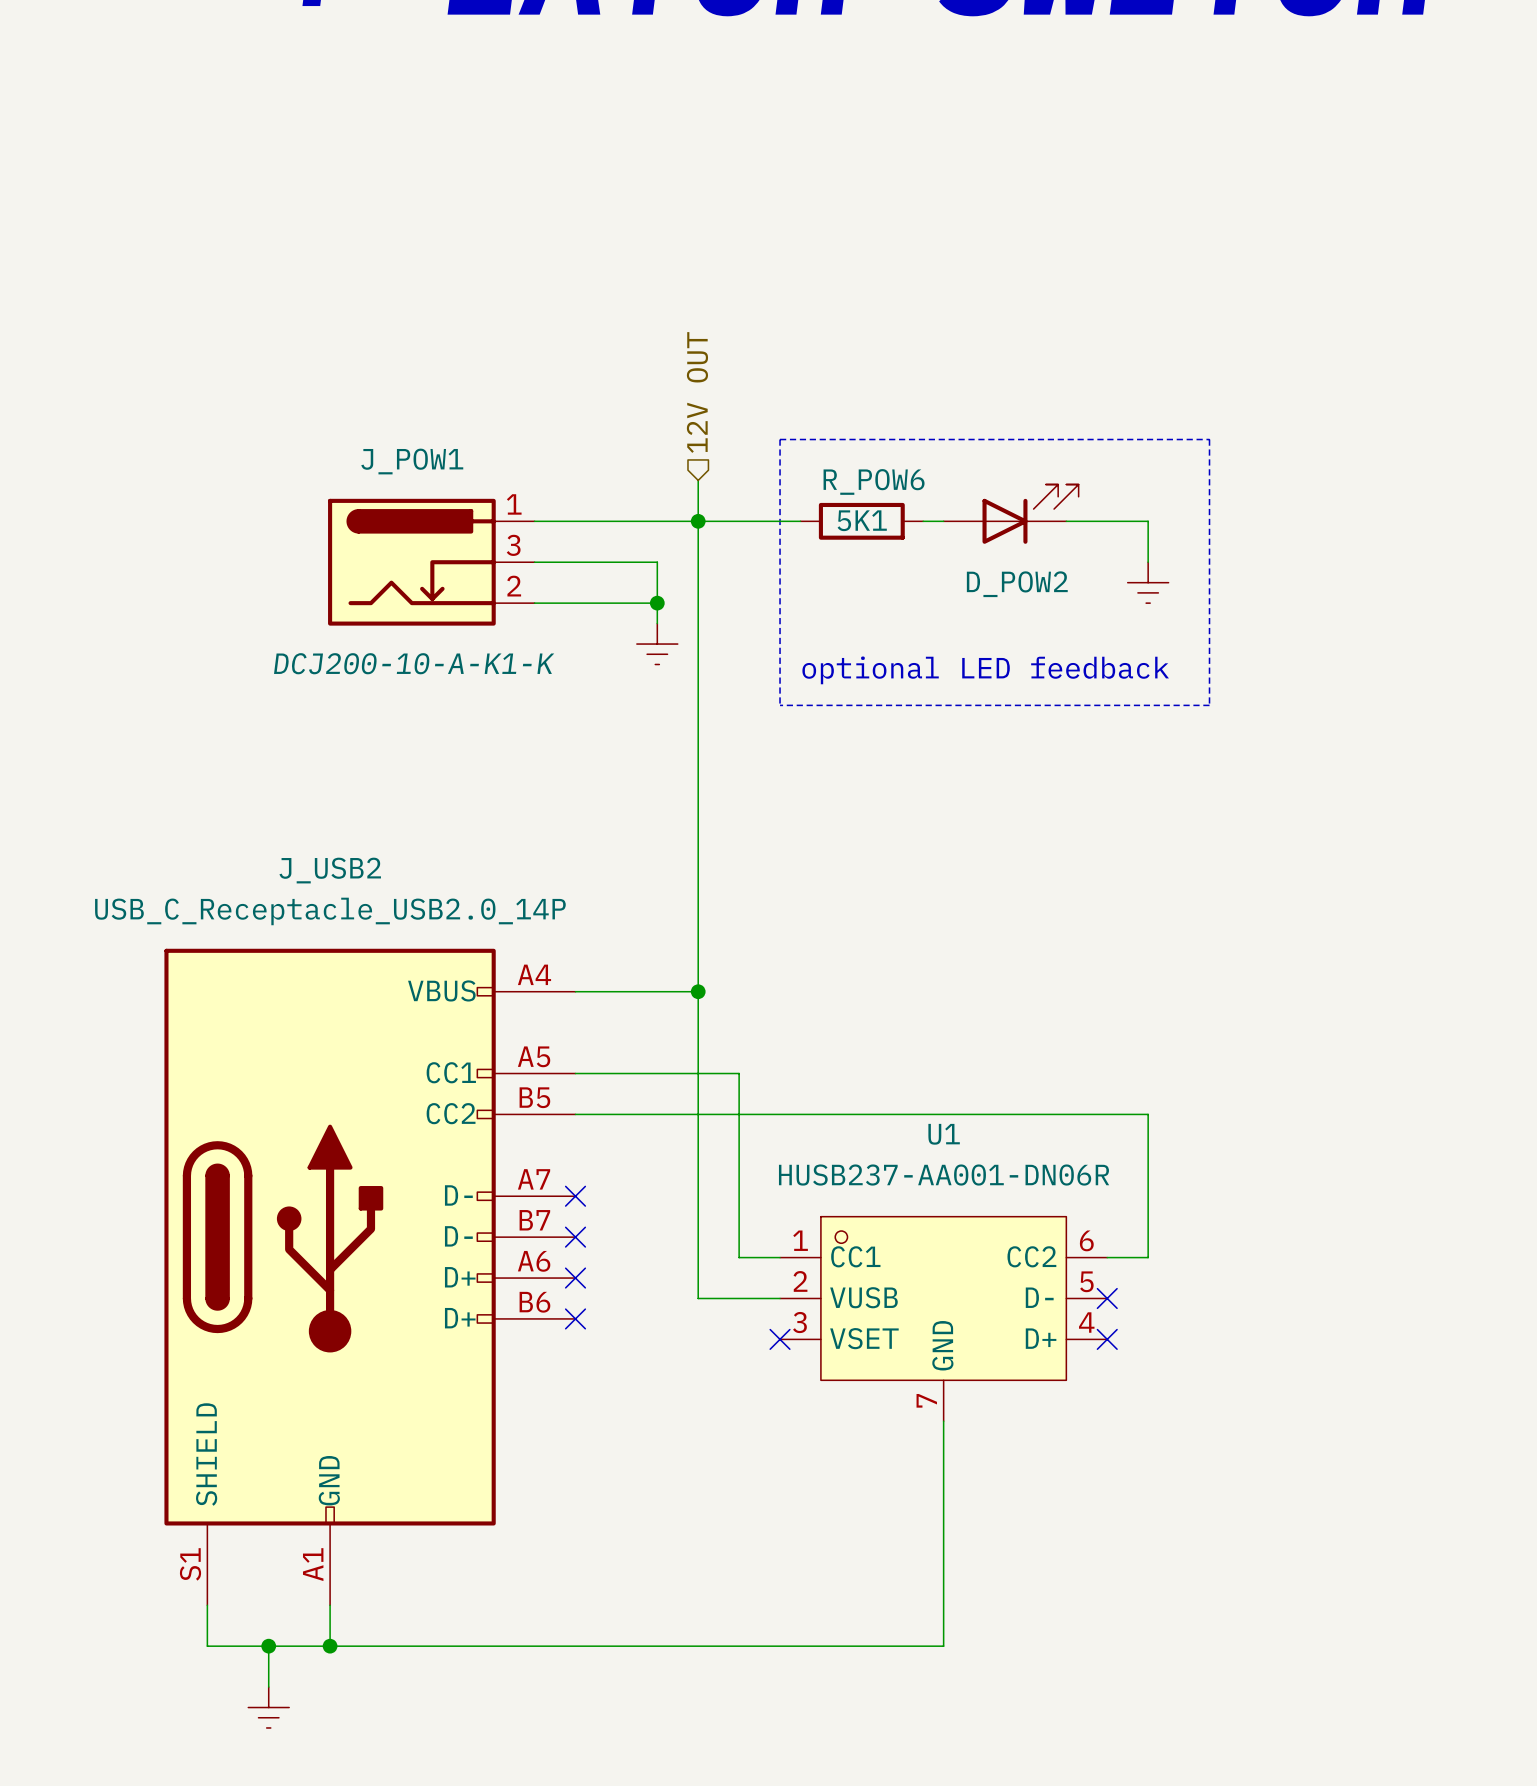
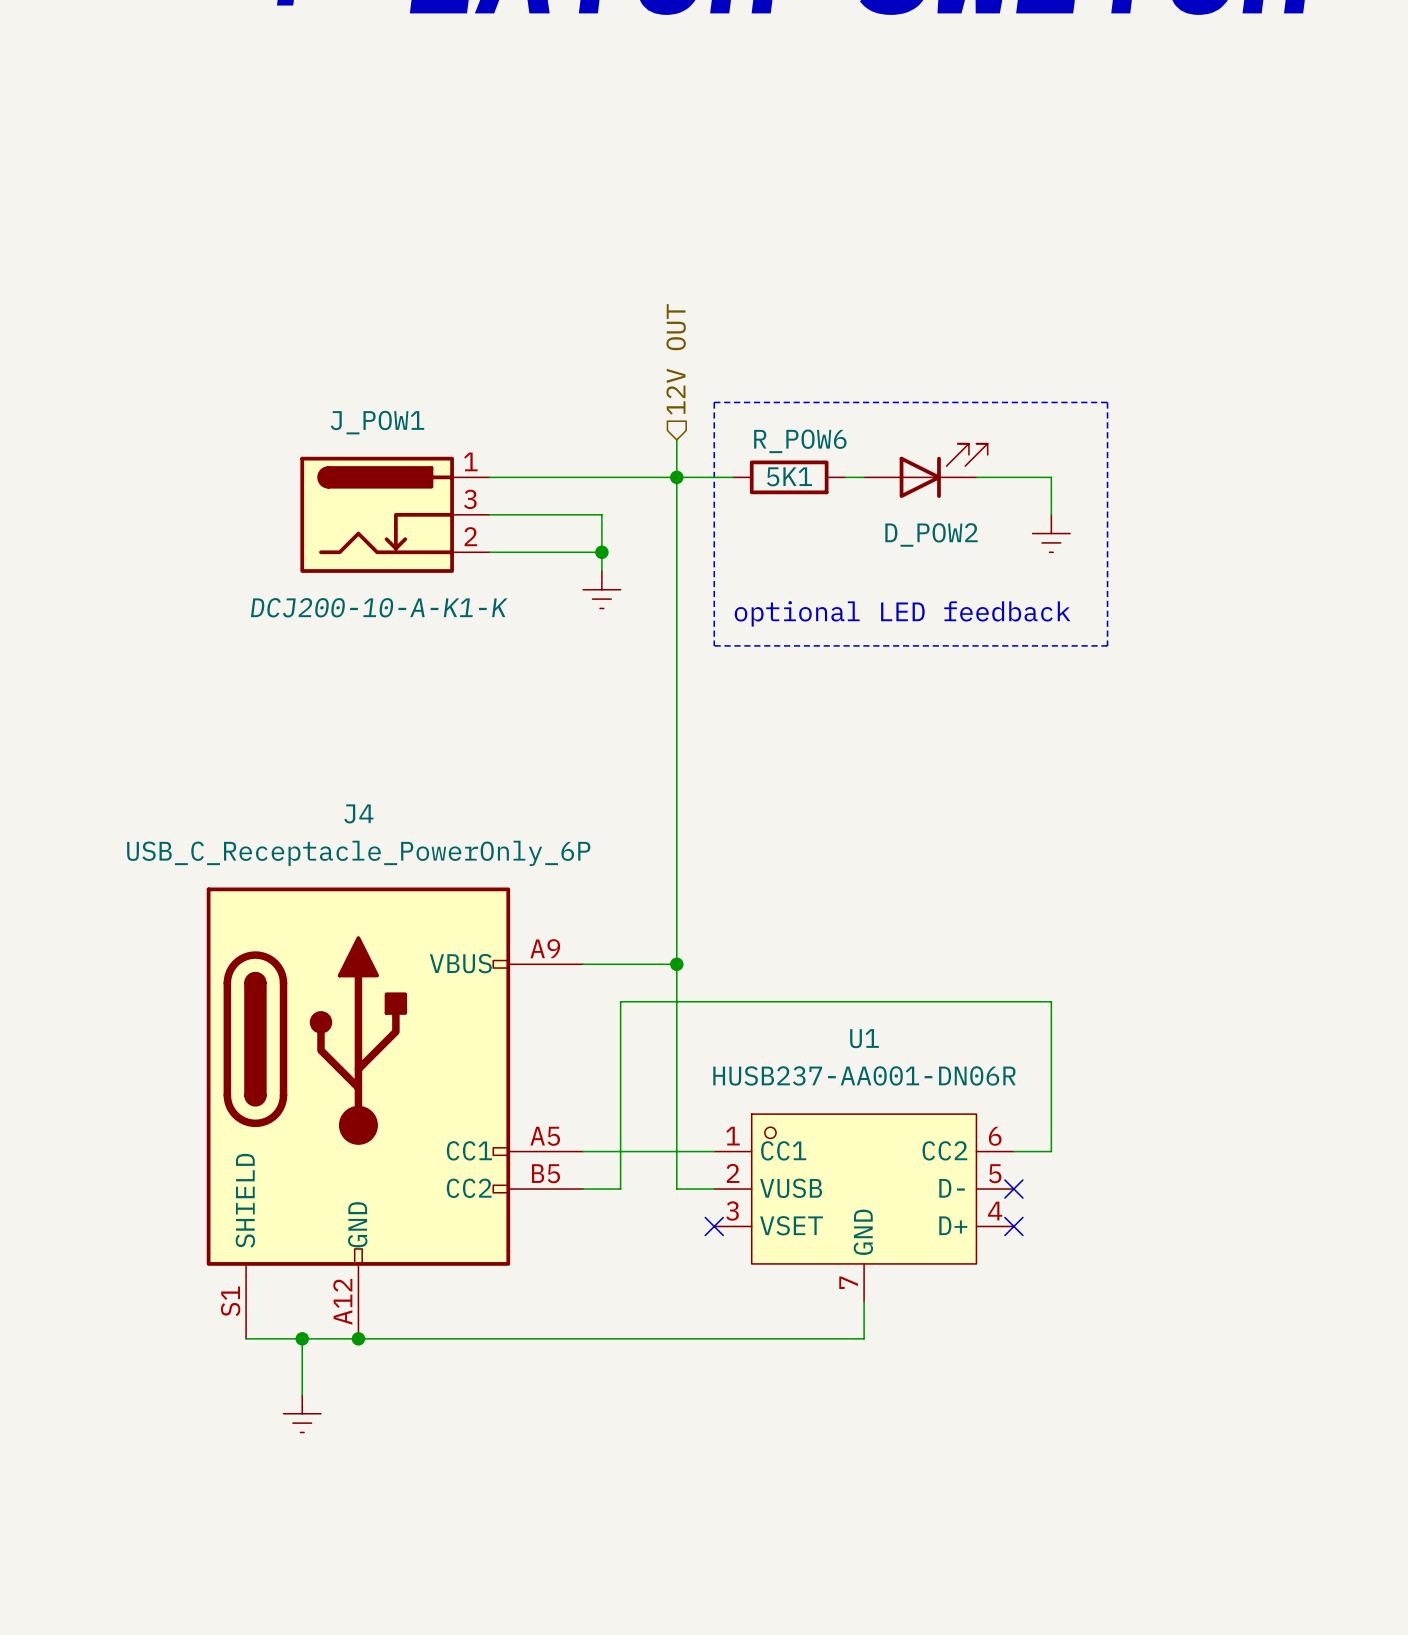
hierarchical label position: 12V OUT (697, 392) -> 12V OUT (676, 359)
wire: (698, 480) (698, 1298) (739, 1298) -> (583, 1151) (676, 1151) (676, 1189)
junction position: (698, 521) -> (676, 477)
wire: (575, 991) (698, 991) -> none
junction position: (698, 991) -> (676, 964)
wire: none -> (583, 964) (676, 964)
wire: (575, 1073) (739, 1073) -> (676, 439) (676, 983)
wire: (575, 1114) (1148, 1114) -> (583, 1189) (620, 1189) (620, 1001) (1051, 1001) (1051, 1020)
no-connect mark: (575, 1196) -> none
J4: none -> USB_C_Receptacle_PowerOnly_6P (394, 1113)
no-connect mark: (575, 1237) -> none
J_USB2: USB_C_Receptacle_USB2.0_14P (369, 1277) -> none
no-connect mark: (575, 1278) -> none
no-connect mark: (575, 1318) -> none
junction: none -> (302, 1338)
junction: none -> (358, 1338)
wire: (943, 1462) (943, 1646) (207, 1646) (207, 1605) -> (864, 1338) (246, 1338)
wire: (330, 1605) (330, 1646) -> none
wire: (268, 1646) (268, 1687) -> none
junction: (268, 1646) -> none
junction: (330, 1646) -> none
power symbol position: (268, 1707) -> (302, 1413)

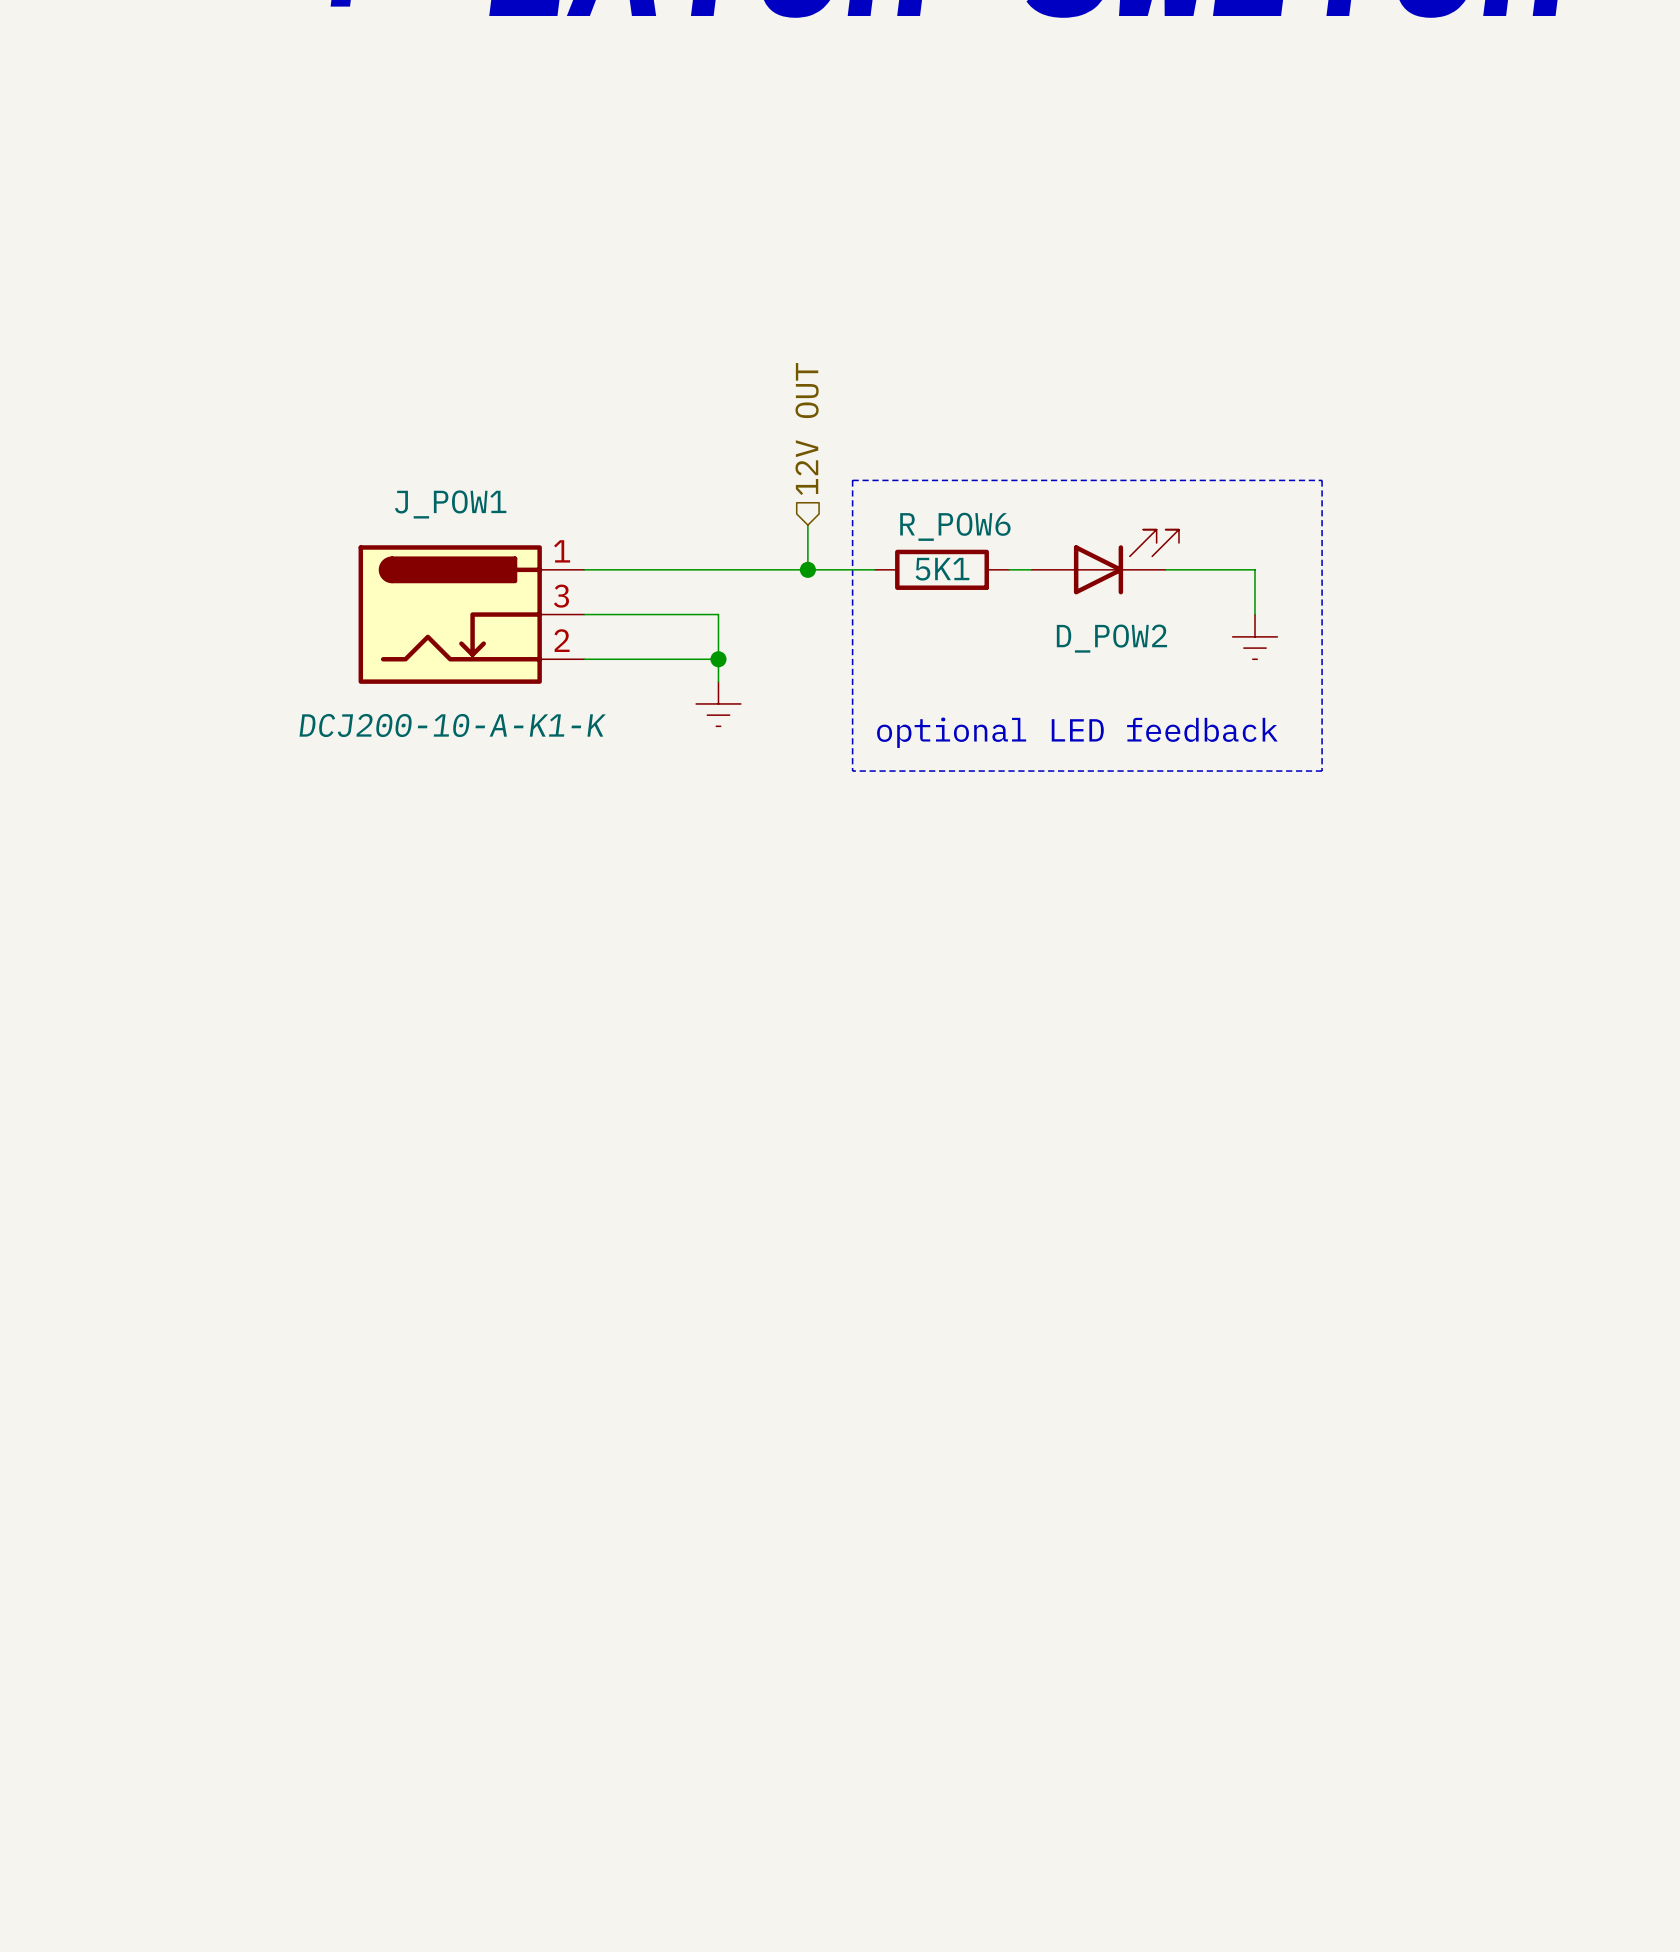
wire: (676, 477) (676, 1189) (714, 1189) -> none
wire: (583, 964) (676, 964) -> none
junction: (676, 964) -> none
J4: USB_C_Receptacle_PowerOnly_6P (394, 1113) -> none
wire: (583, 1151) (714, 1151) -> none
wire: (1013, 1151) (1051, 1151) (1051, 1001) (620, 1001) (620, 1189) (583, 1189) -> none
no-connect mark: (1013, 1189) -> none
U1: HUSB237-AA001-DN06R (864, 1207) -> none
no-connect mark: (714, 1226) -> none
no-connect mark: (1013, 1226) -> none
wire: (864, 1301) (864, 1338) (246, 1338) -> none
wire: (302, 1338) (302, 1395) -> none
junction: (302, 1338) -> none
junction: (358, 1338) -> none
power symbol: (302, 1413) -> none

